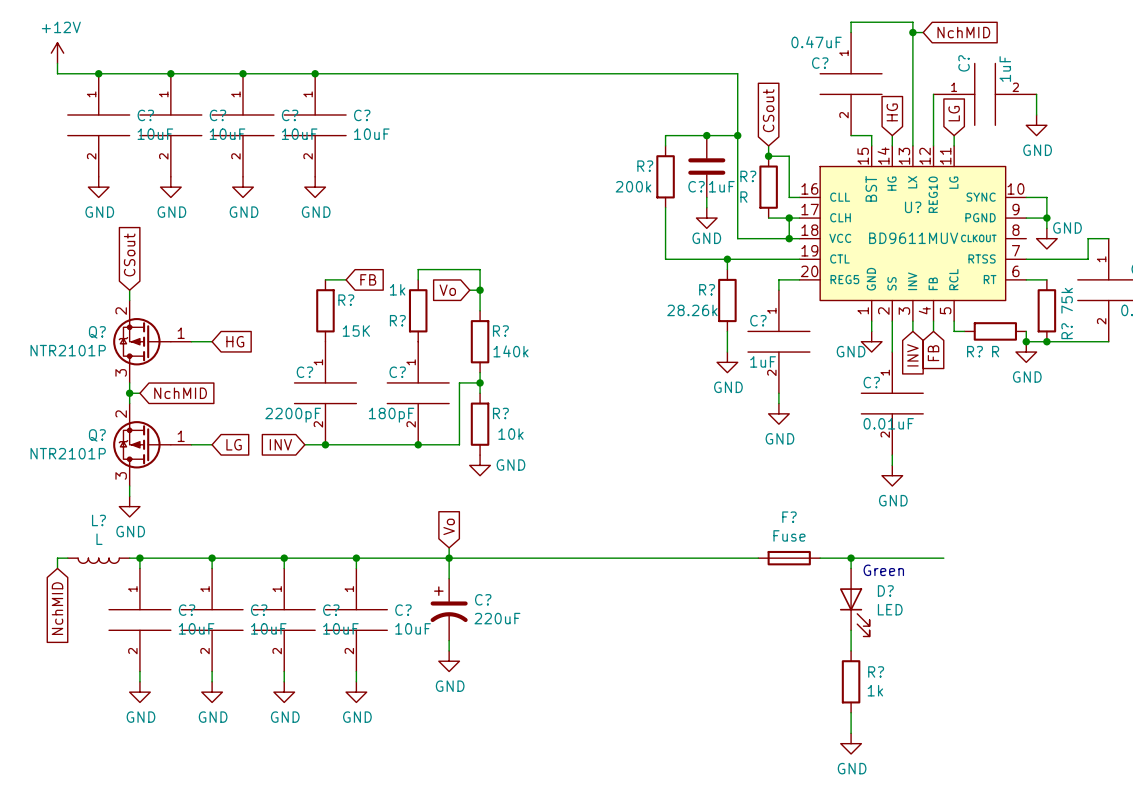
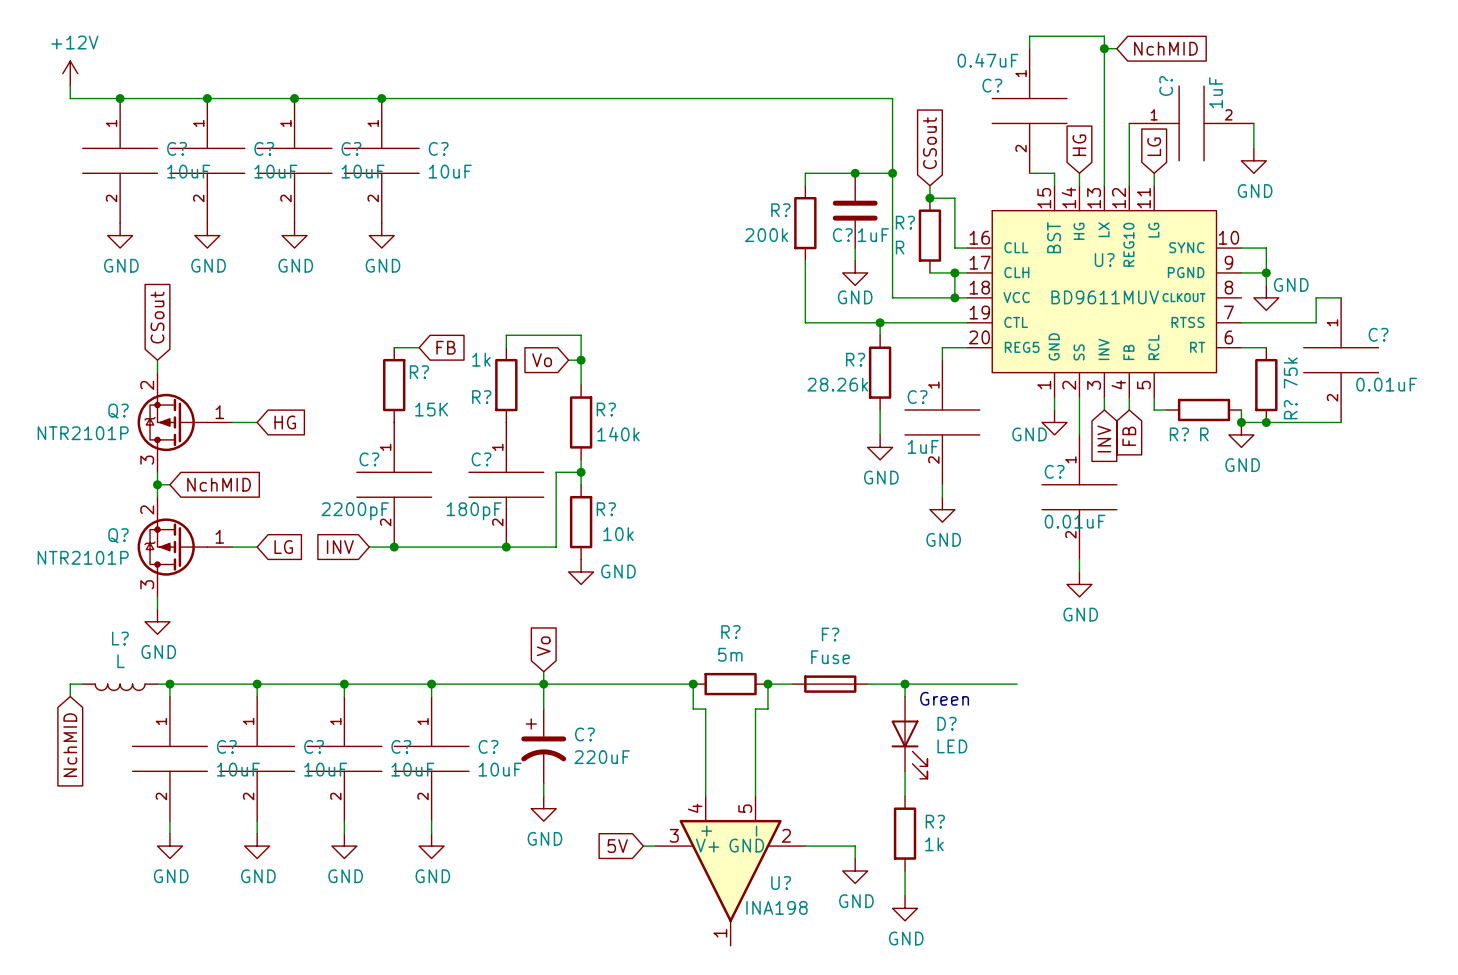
wire: (572, 558) (634, 558) -> (693, 684) (693, 709) (705, 709) (705, 796)
junction: none -> (693, 684)
R?: none -> 5m (730, 684)
wire: none -> (767, 684) (767, 709) (755, 709) (755, 796)
junction: none -> (767, 684)
junction: none -> (905, 684)
F? position: (789, 558) -> (830, 684)
wire: (840, 558) (943, 558) -> none
wire: (851, 558) (851, 568) -> (905, 684) (905, 696)
junction: (851, 558) -> none
text position: Green (883, 570) -> Green (944, 698)
D? position: (854, 602) -> (909, 737)
wire: (851, 630) (851, 650) -> (905, 771) (905, 796)
R? position: (851, 681) -> (905, 833)
global label: none -> 5V (617, 846)
wire: none -> (643, 846) (655, 846)
wire: none -> (805, 846) (855, 846) (855, 858)
U?: none -> INA198 (730, 870)
power symbol: none -> GND (855, 870)
wire: (851, 712) (851, 733) -> (905, 870) (905, 895)
power symbol: none -> GND (905, 908)
power symbol: GND (851, 743) -> none

